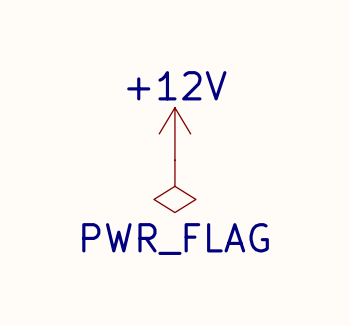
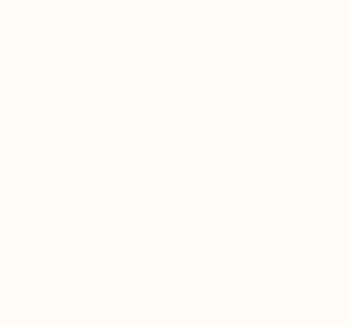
power symbol: +12V (174, 133) -> none
power symbol: PWR_FLAG (174, 186) -> none

